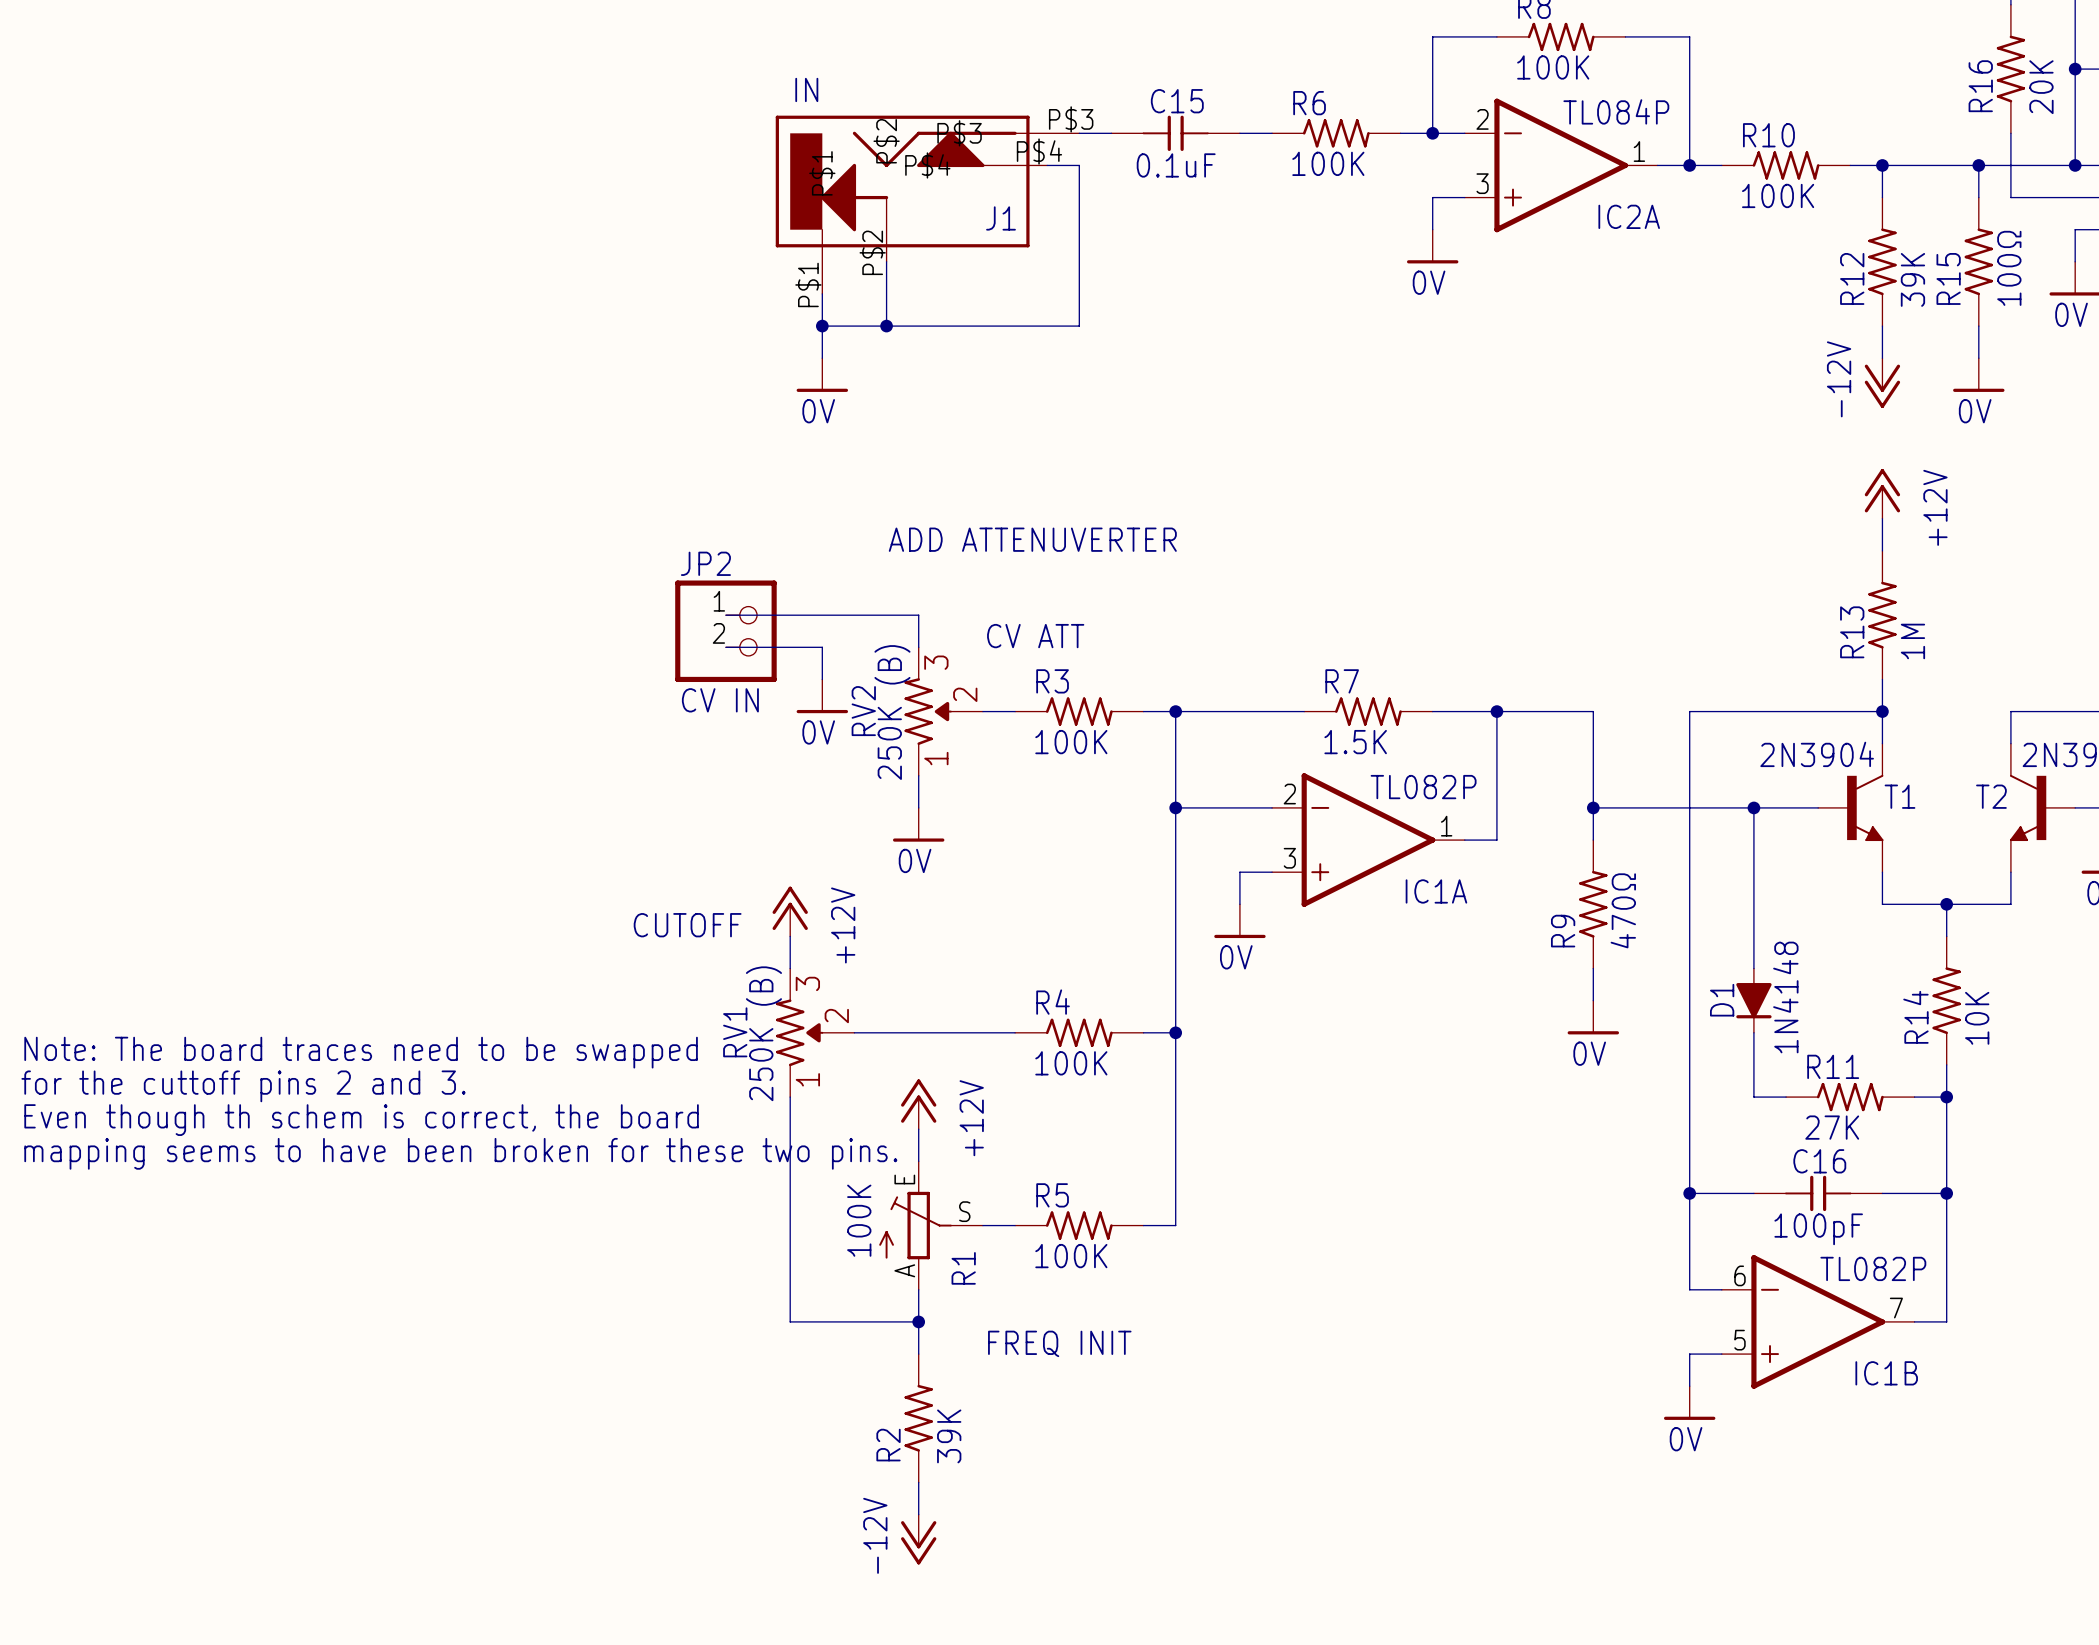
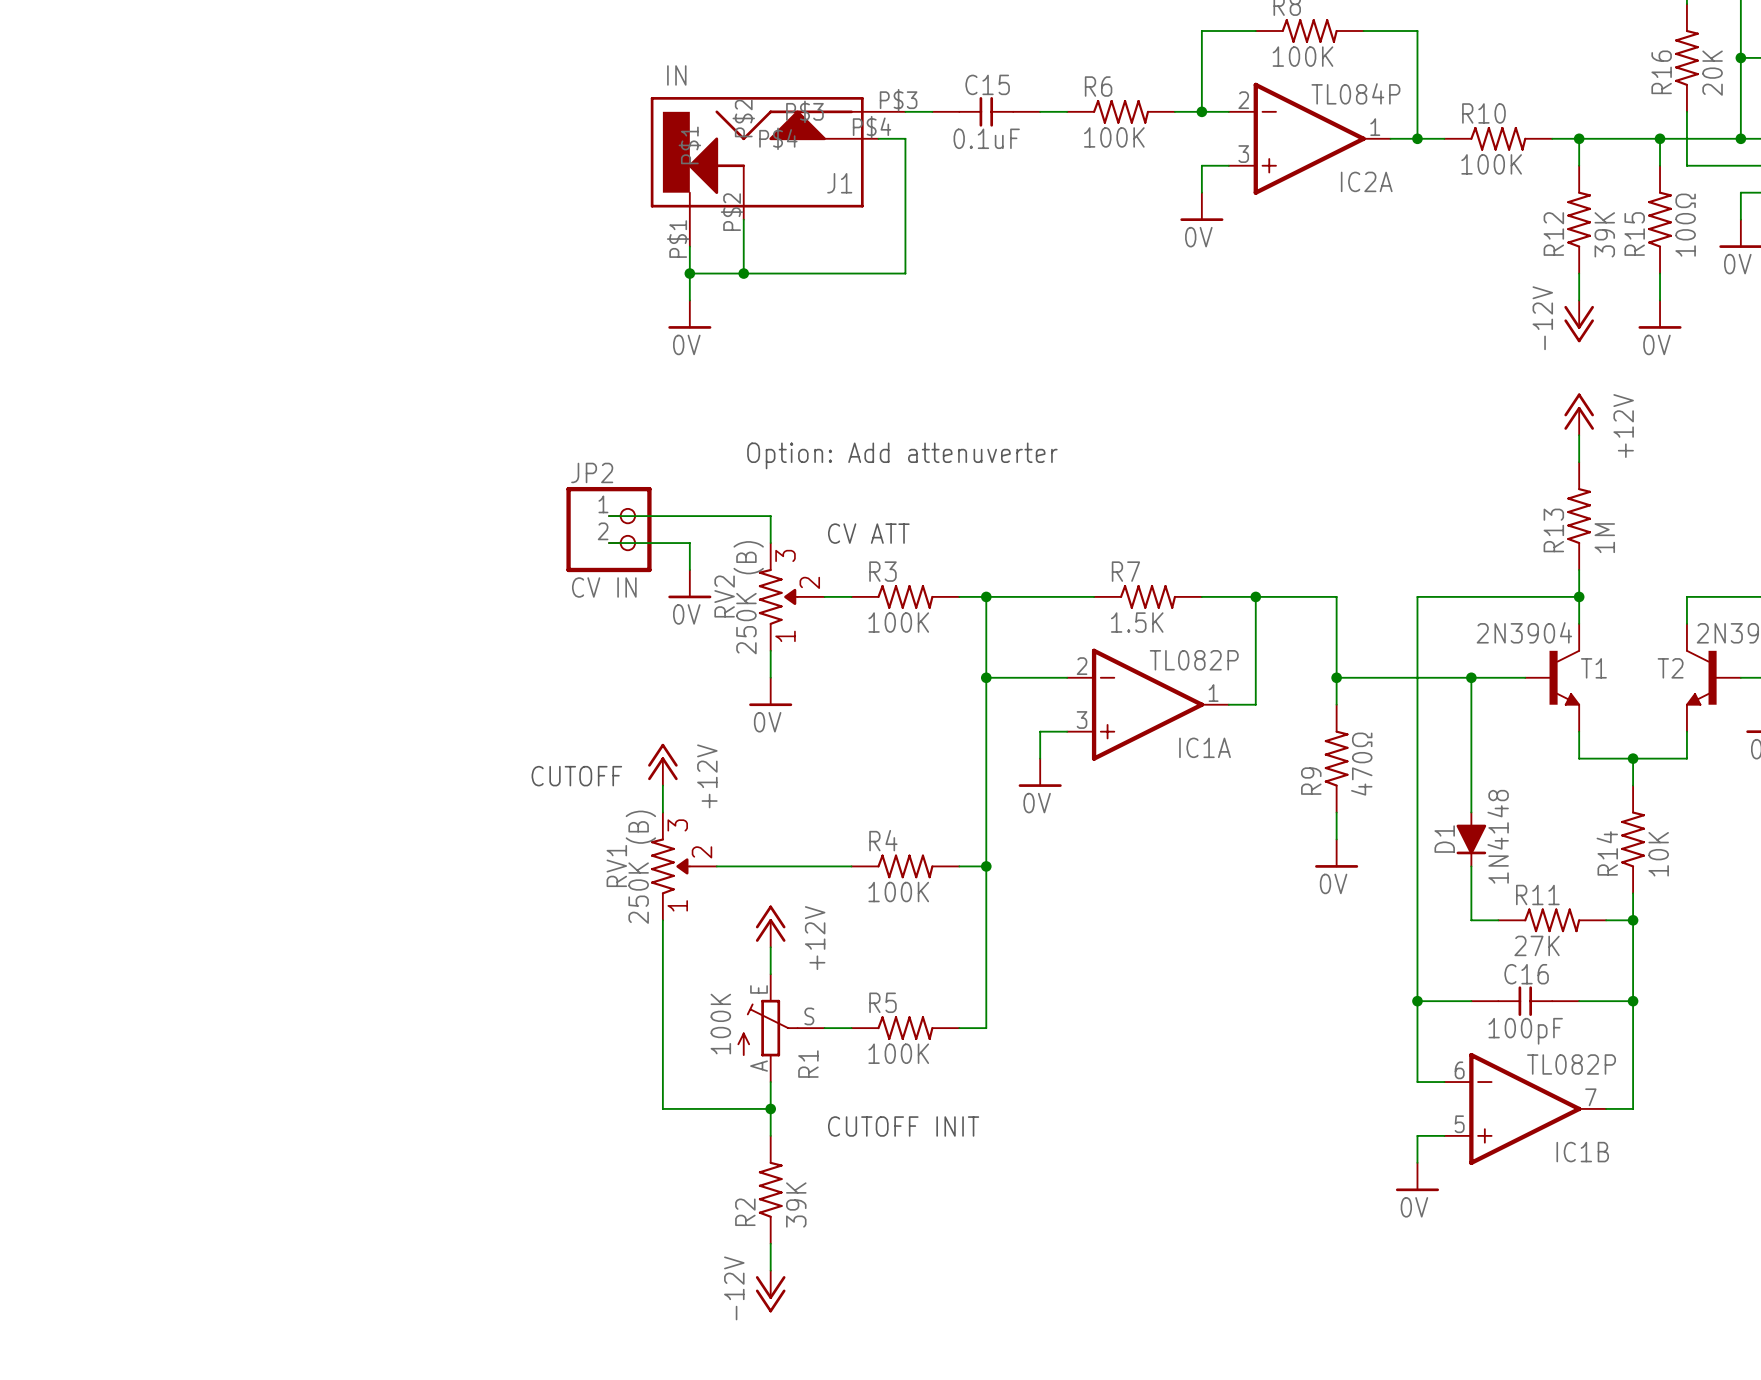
text: ADD ATTENUVERTER (1032, 539) -> Option: Add attenuverter (902, 455)
text: Note: The board traces need to be swapped (361, 1052) -> none
text: for the cuttoff pins 2 and 3. (243, 1086) -> none
text: Even though th schem is correct, the board (361, 1120) -> none
text: mapping seems to have been broken for these two pins. (460, 1153) -> none
text: FREQ INIT (1059, 1343) -> CUTOFF INIT (903, 1126)

